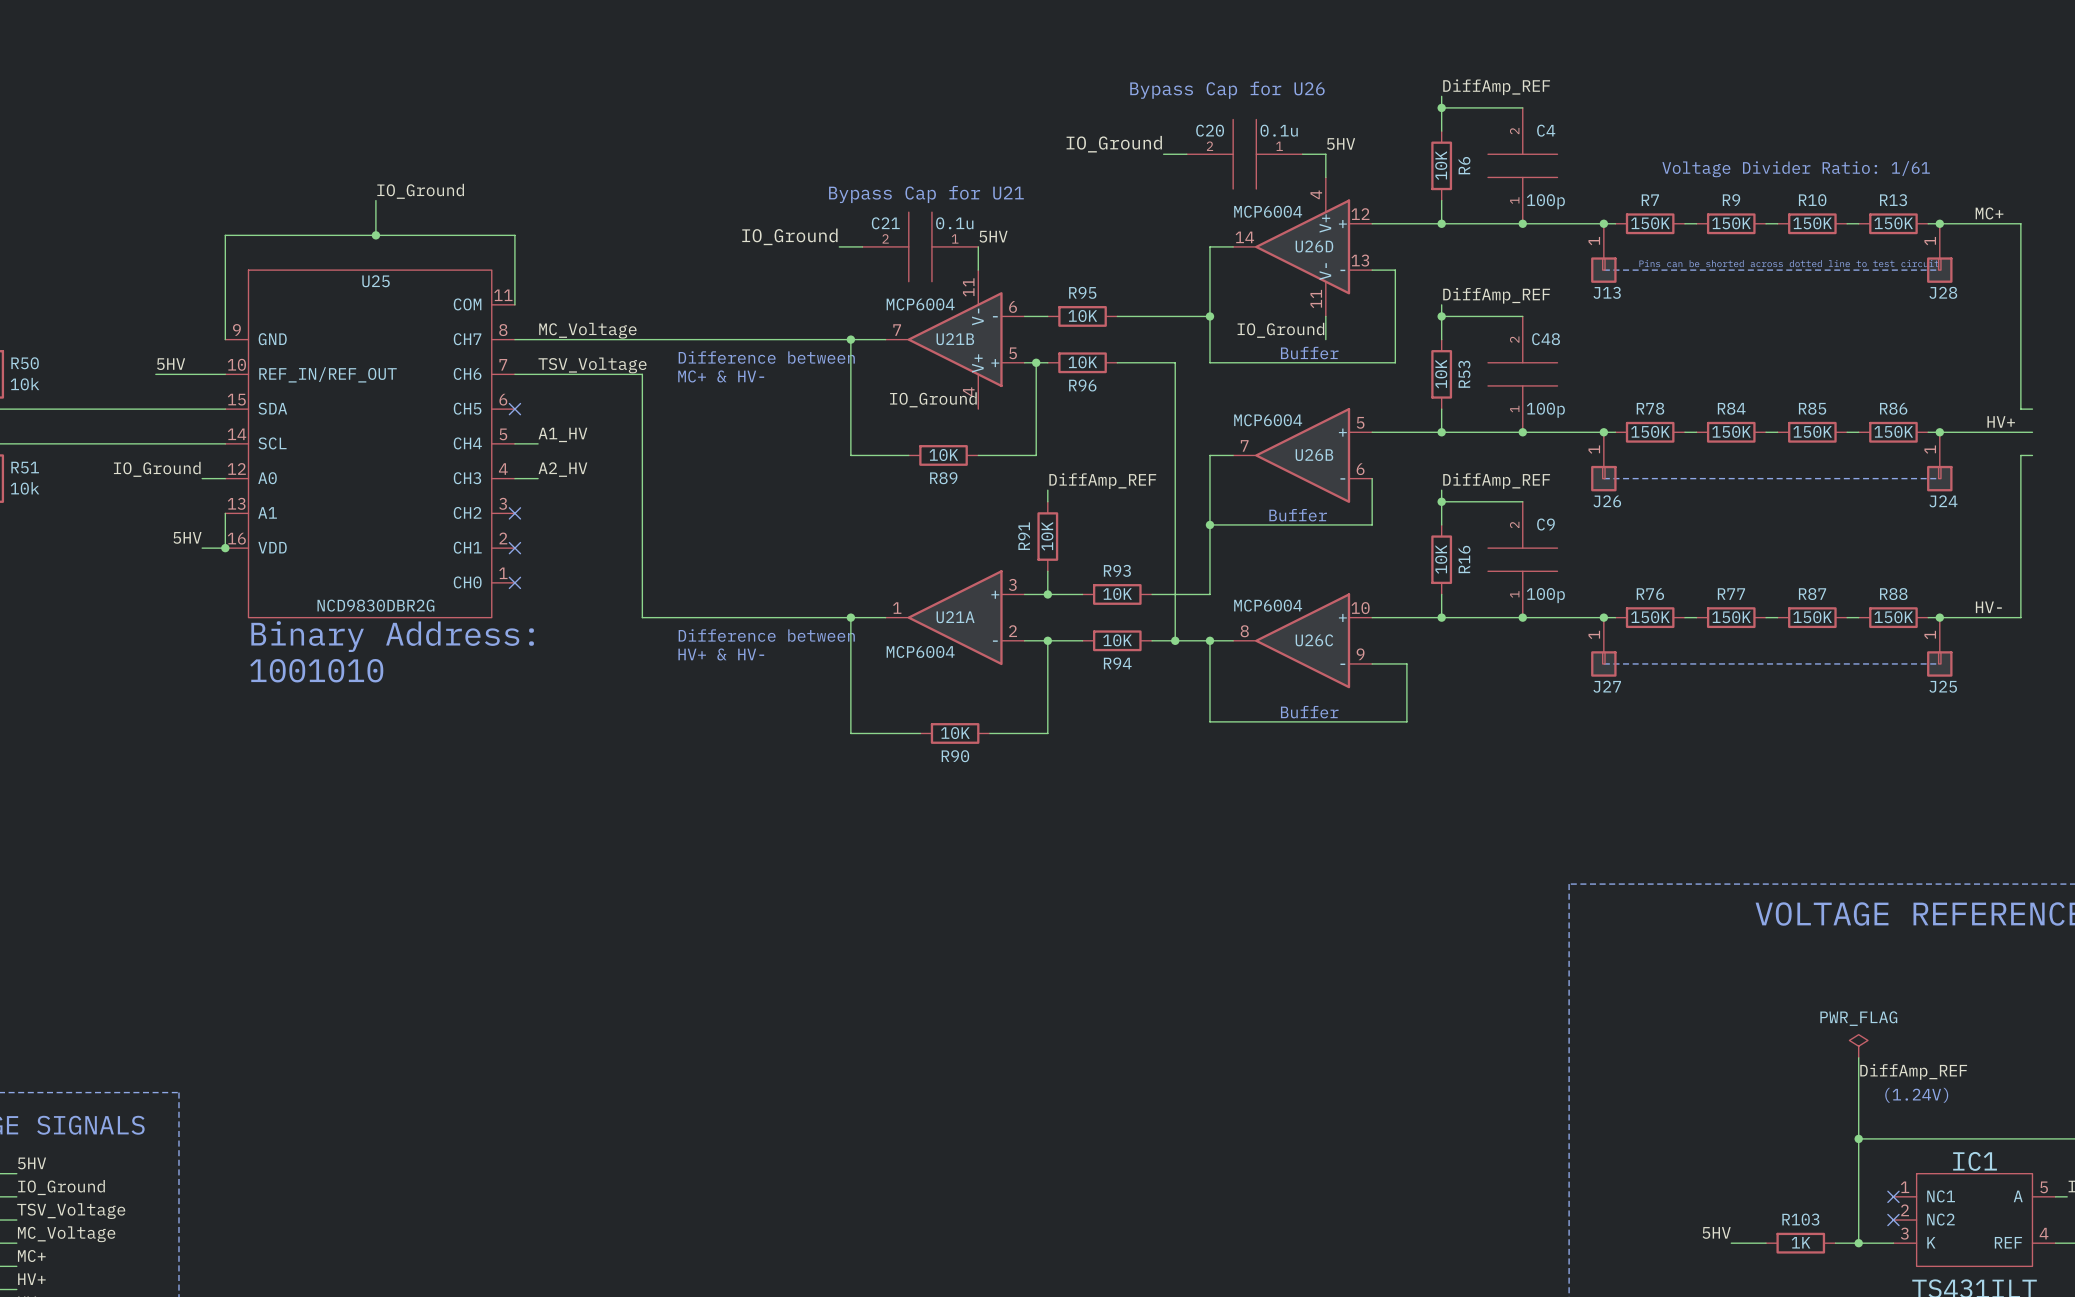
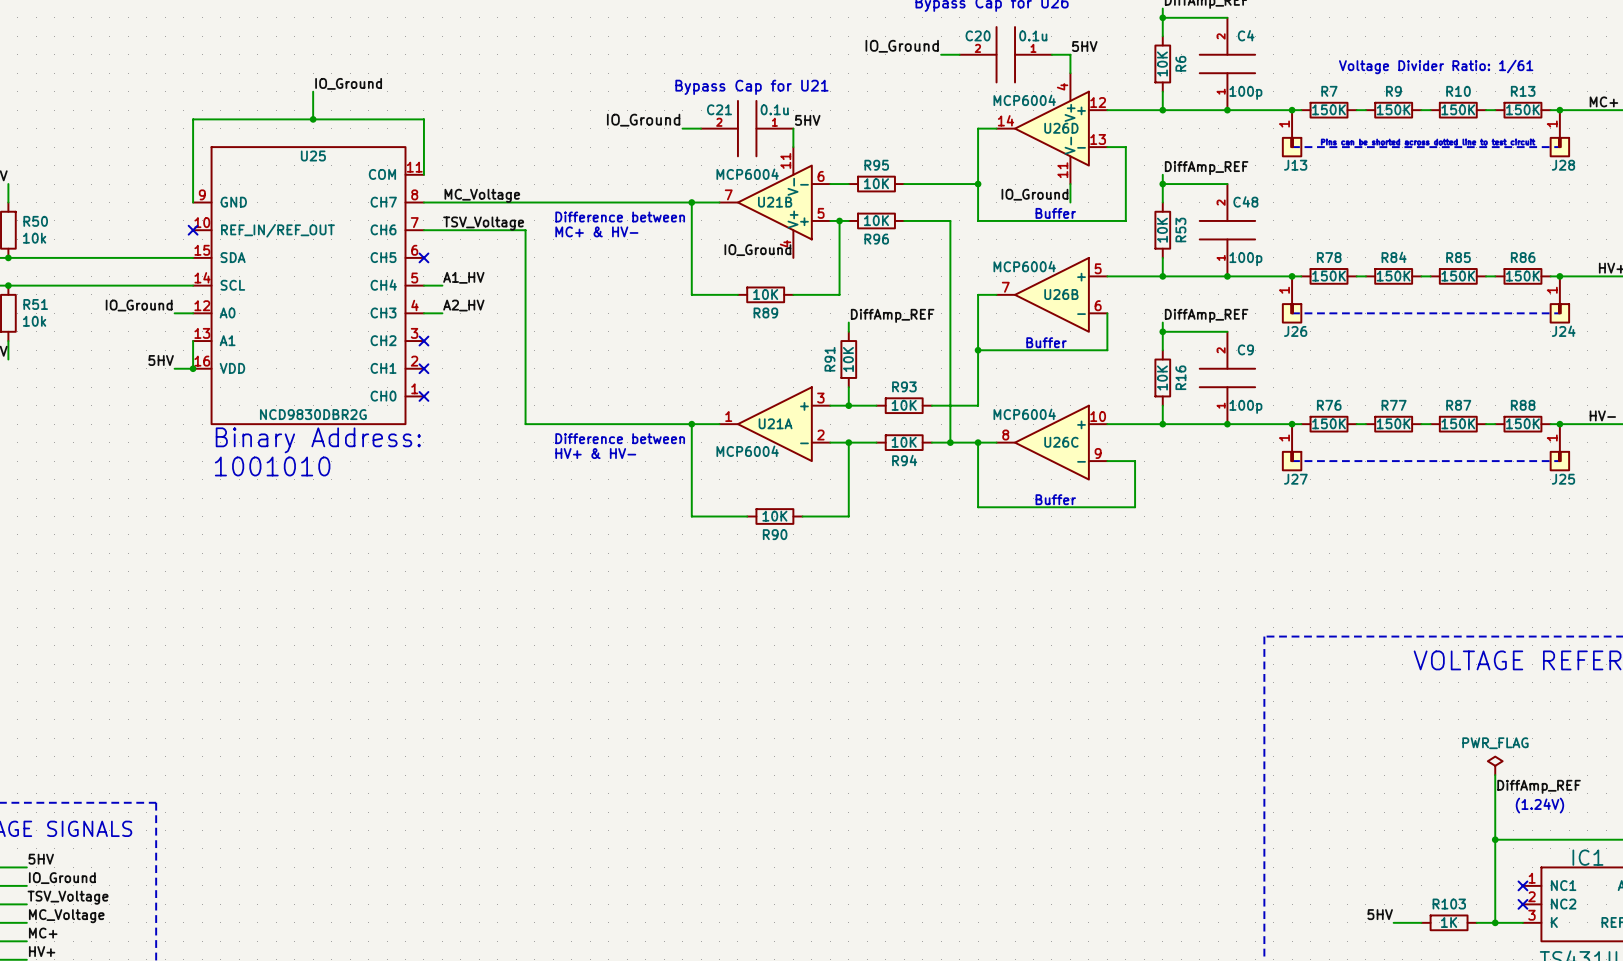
label: 5HV (171, 364) -> none
wire: (155, 374) (225, 374) -> none
no-connect mark: none -> (193, 230)

